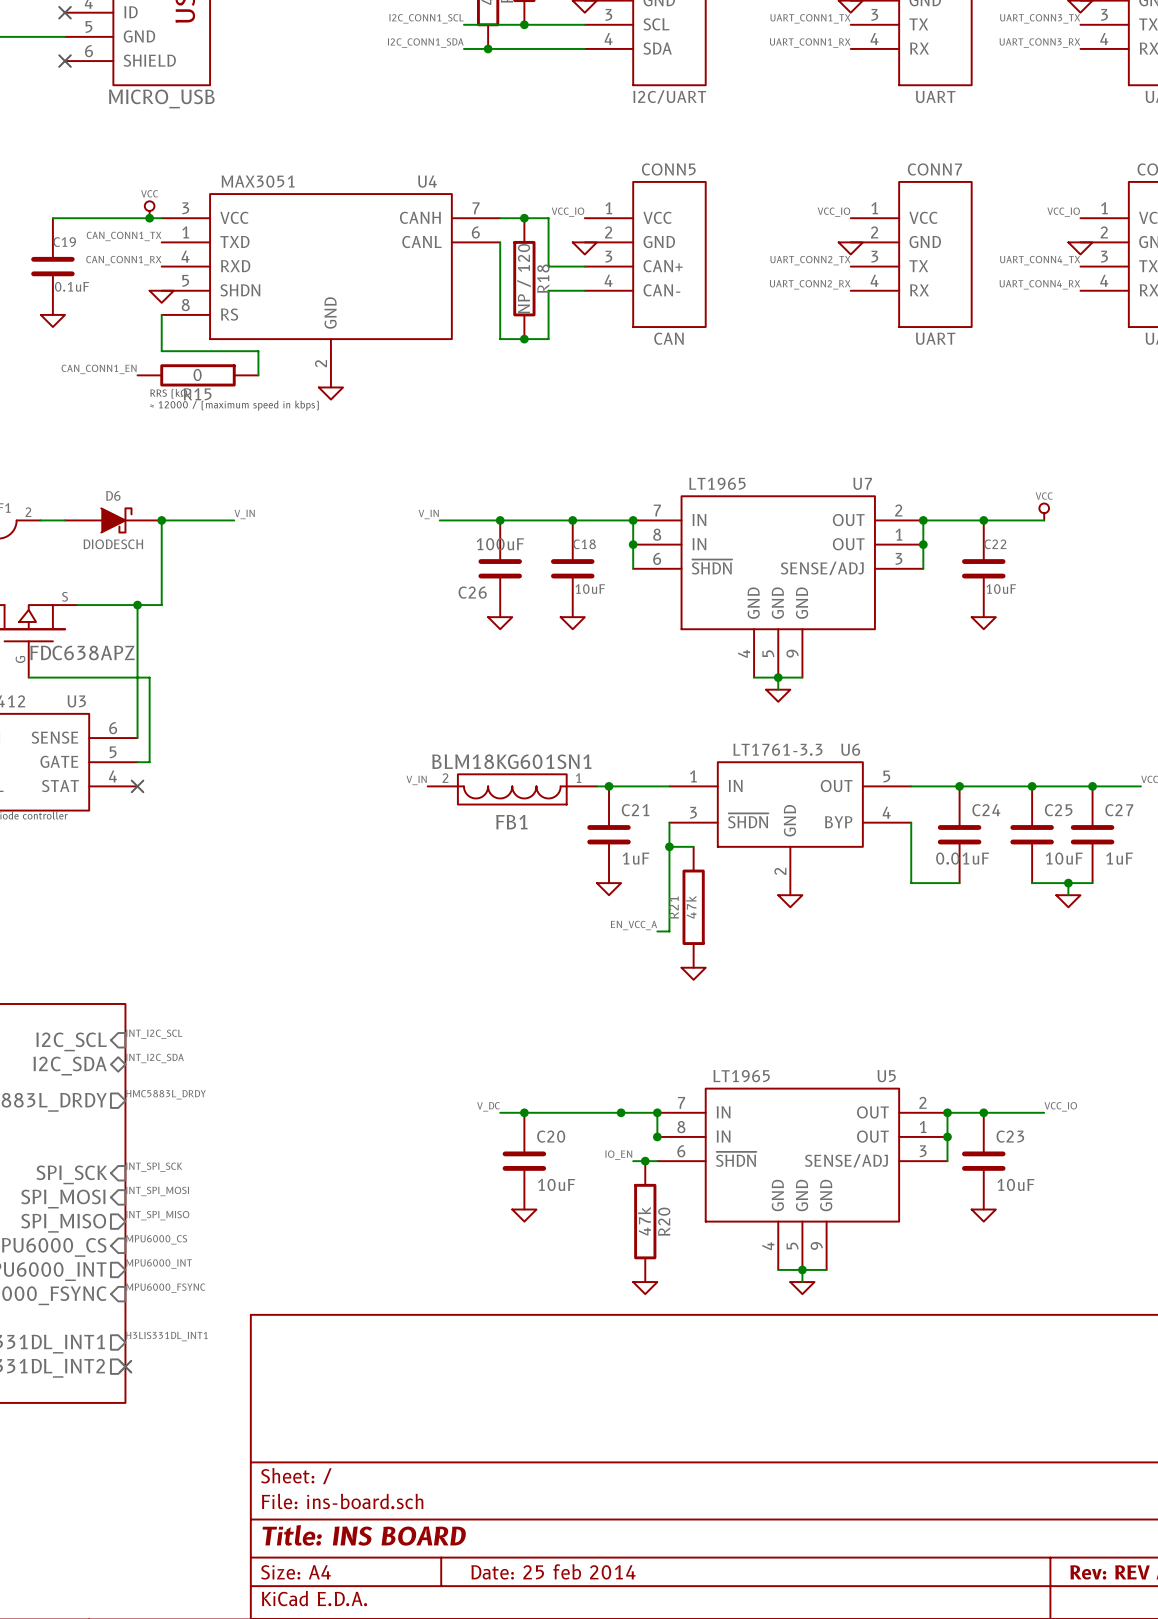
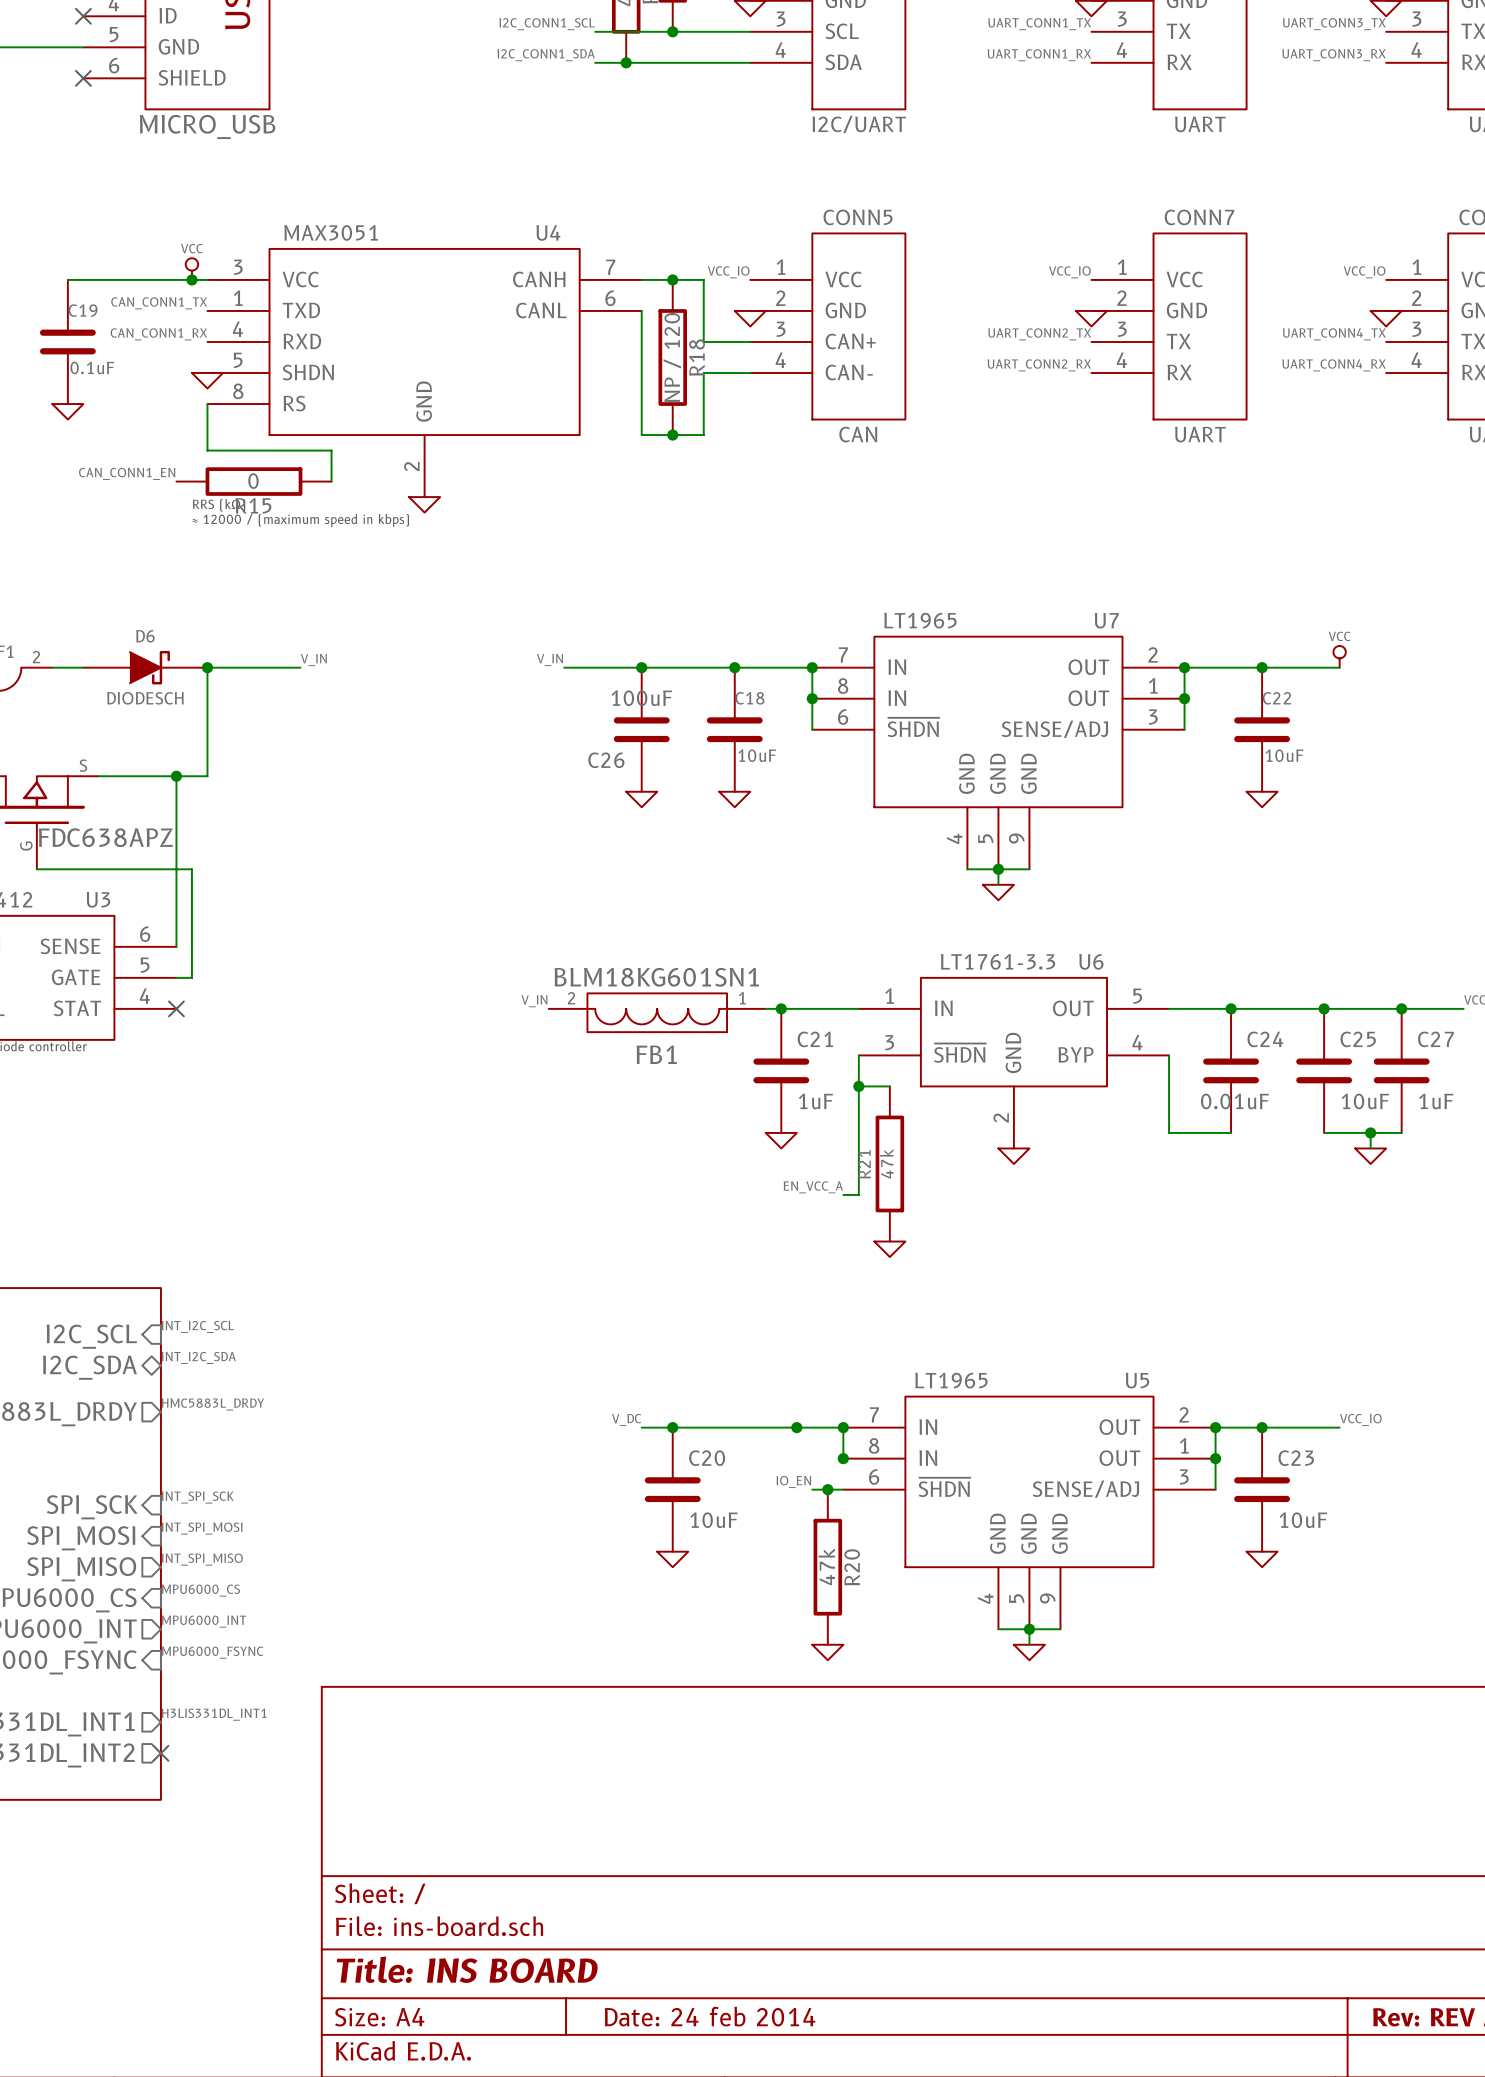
title block: Date: 25 feb 2014 (553, 1571) -> Date: 24 feb 2014 (710, 2016)

